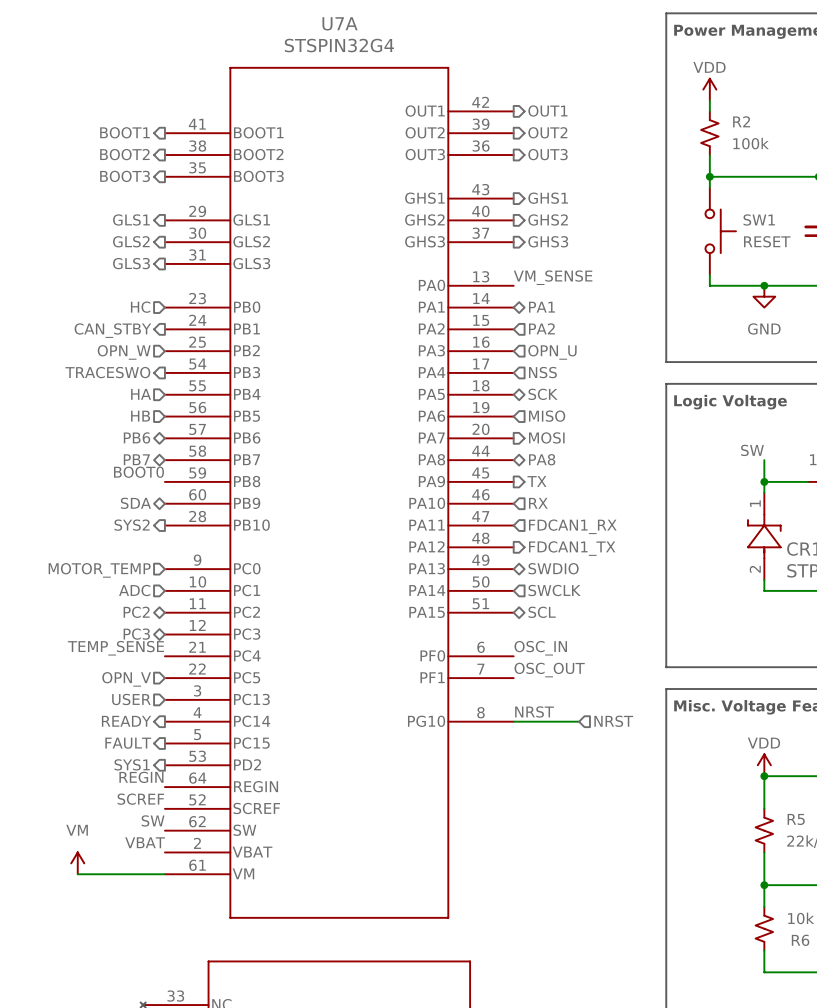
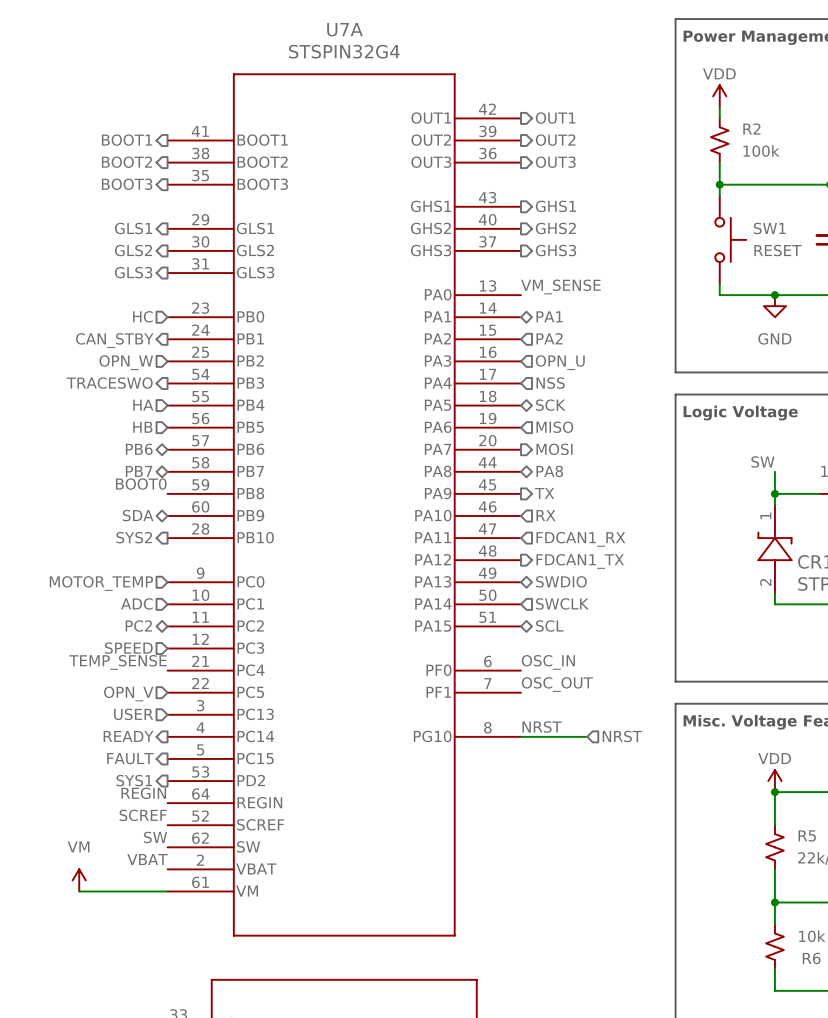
hierarchical label shape: bidirectional (136, 634) -> input (128, 648)
hierarchical label: PC3 (136, 634) -> SPEED (128, 648)

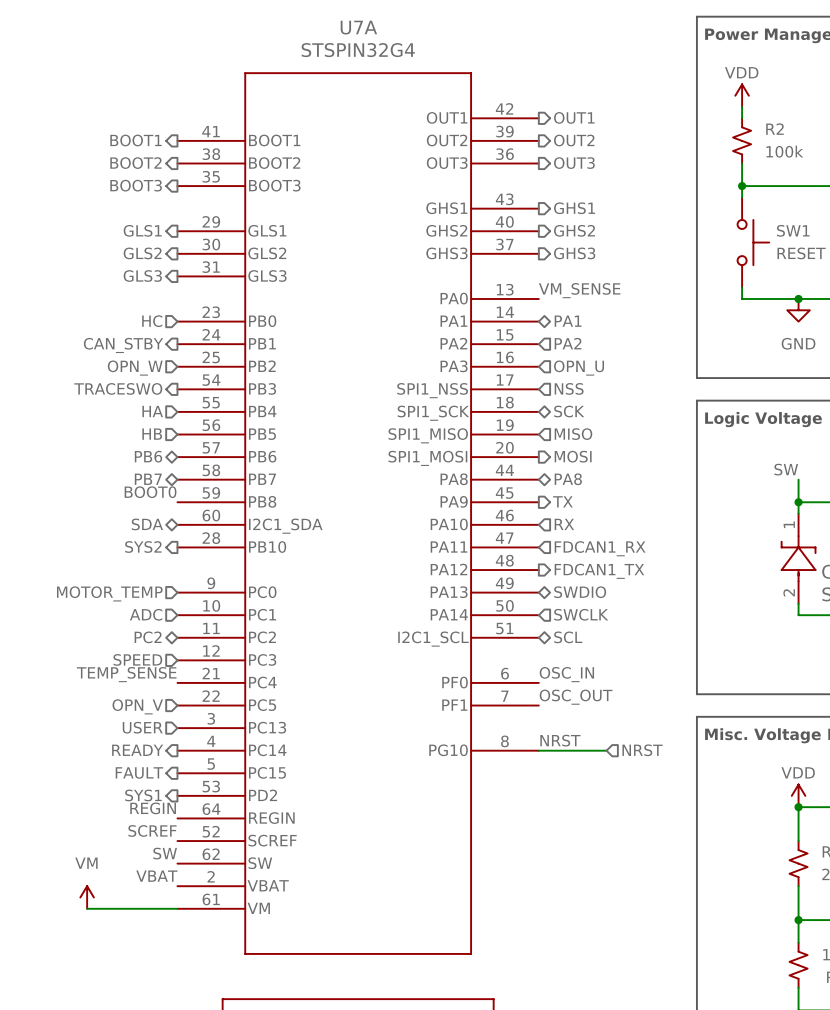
U7A pin name: PA4 (438, 383) -> SPI1_NSS (432, 390)
U7A pin name: PA5 (438, 405) -> SPI1_SCK (433, 413)
U7A pin name: PA6 (438, 427) -> SPI1_MISO (428, 435)
U7A pin name: PA7 (438, 449) -> SPI1_MOSI (427, 458)
U7A pin name: PB9 (250, 515) -> I2C1_SDA (285, 526)
U7A pin name: PA15 (433, 626) -> I2C1_SCL (433, 639)

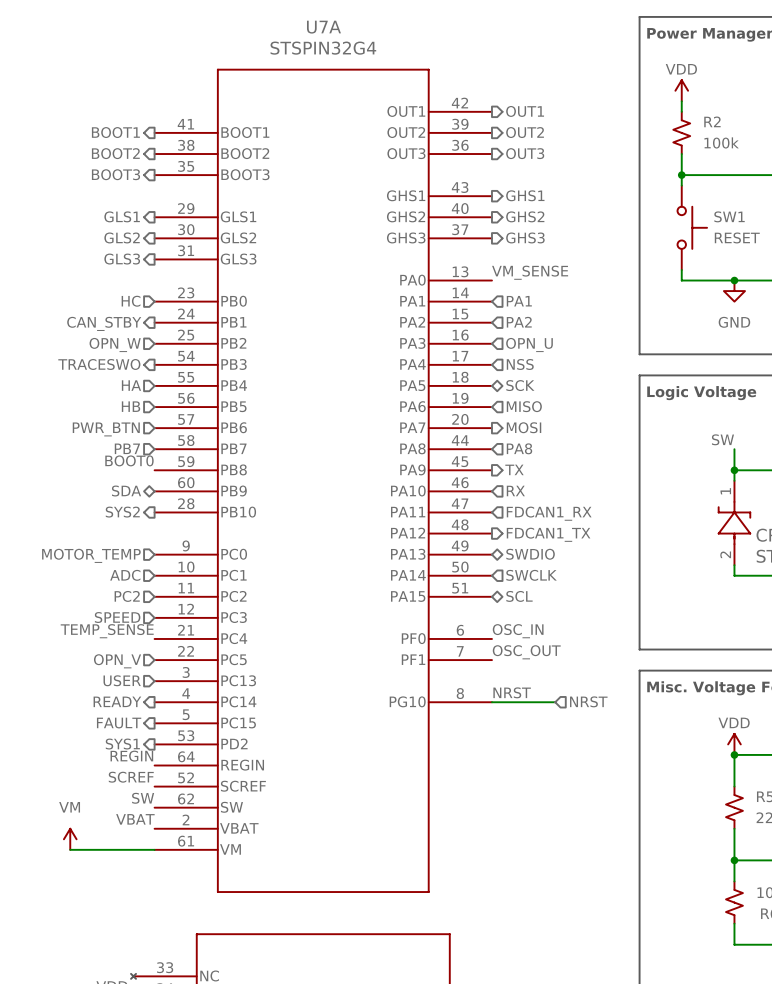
hierarchical label shape: bidirectional (568, 321) -> input (519, 301)
U7A pin name: SPI1_NSS (432, 390) -> PA4 (413, 364)
U7A pin name: SPI1_SCK (433, 413) -> PA5 (412, 385)
U7A pin name: SPI1_MISO (428, 435) -> PA6 (412, 406)
hierarchical label shape: bidirectional (148, 456) -> input (106, 429)
hierarchical label: PB6 (148, 456) -> PWR_BTN (106, 429)
U7A pin name: SPI1_MOSI (427, 458) -> PA7 (412, 427)
hierarchical label shape: bidirectional (148, 479) -> input (127, 448)
hierarchical label shape: bidirectional (568, 479) -> input (519, 448)
U7A pin name: I2C1_SDA (285, 526) -> PB9 (234, 491)
hierarchical label shape: bidirectional (148, 637) -> input (127, 596)
U7A pin name: I2C1_SCL (433, 639) -> PA15 (408, 596)

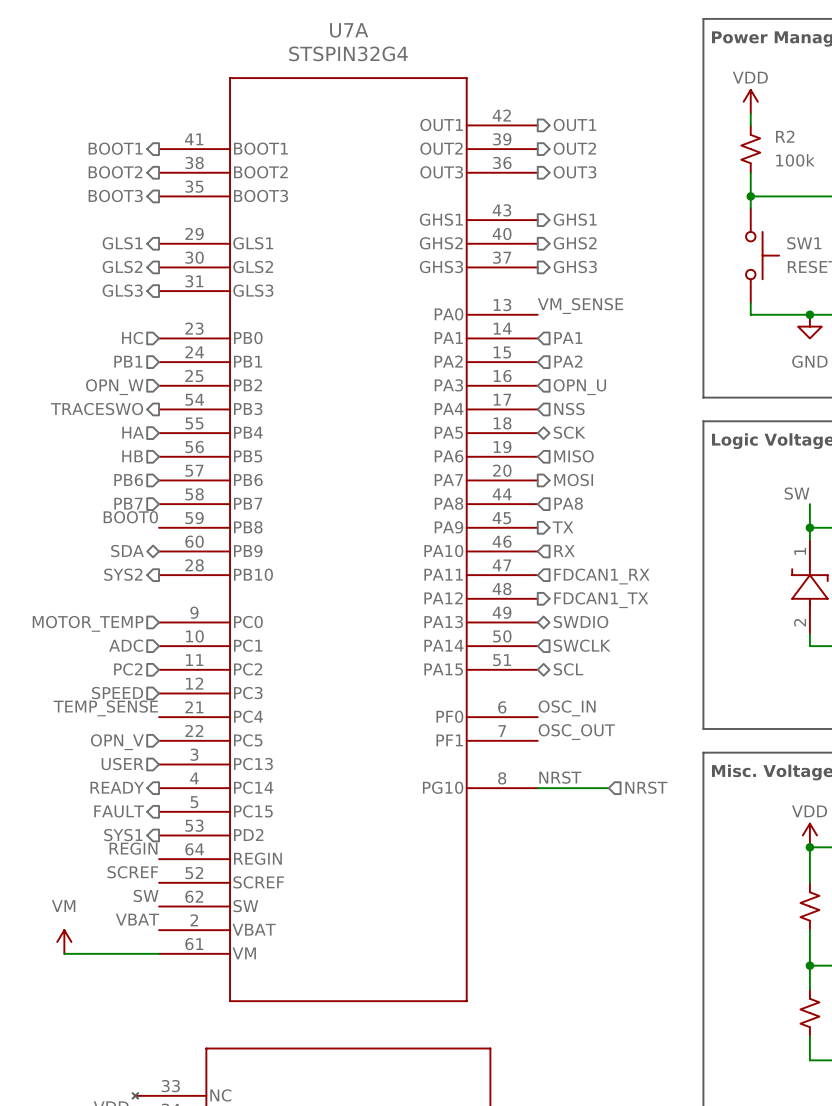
hierarchical label shape: output (104, 323) -> input (128, 361)
hierarchical label: CAN_STBY (104, 323) -> PB1 (128, 361)
hierarchical label: PWR_BTN (106, 429) -> PB6 (128, 480)

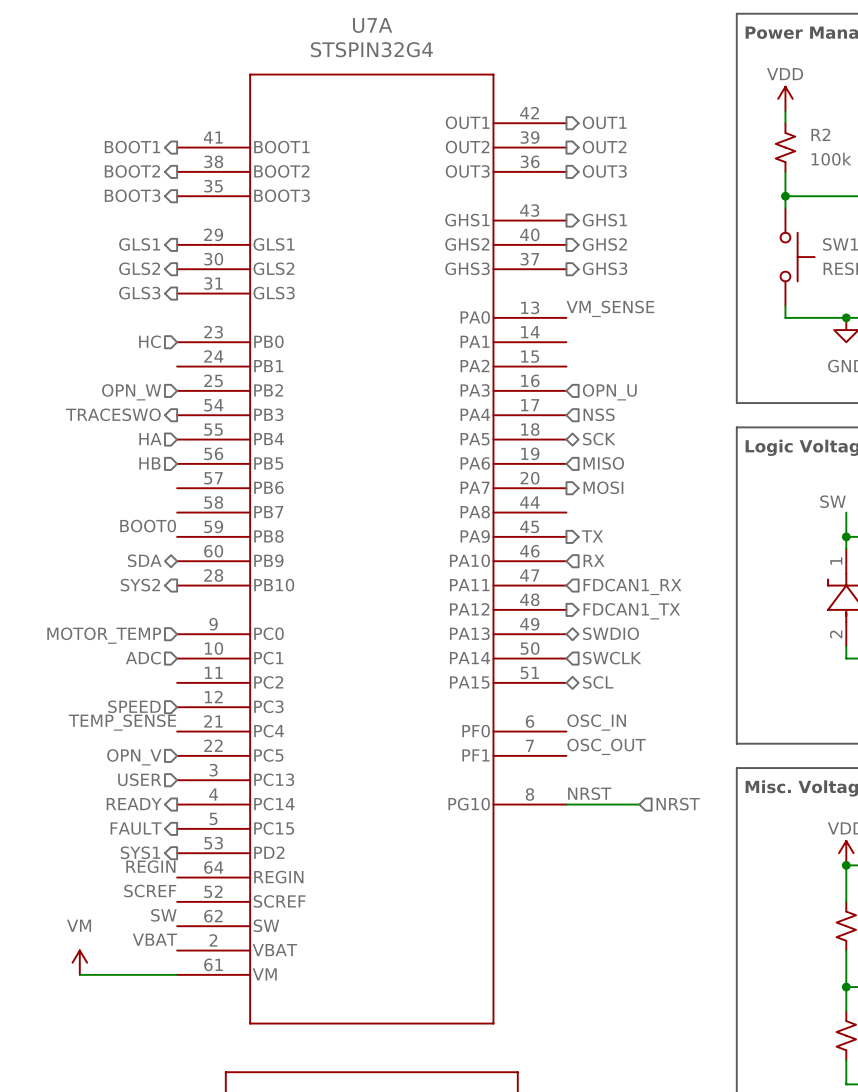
hierarchical label: PA1 (568, 338) -> none
hierarchical label: PB1 (128, 361) -> none
hierarchical label: PA2 (568, 361) -> none
hierarchical label: PB6 (128, 480) -> none
hierarchical label: PB7 (128, 503) -> none
hierarchical label: PA8 (568, 503) -> none
hierarchical label: PC2 (128, 669) -> none

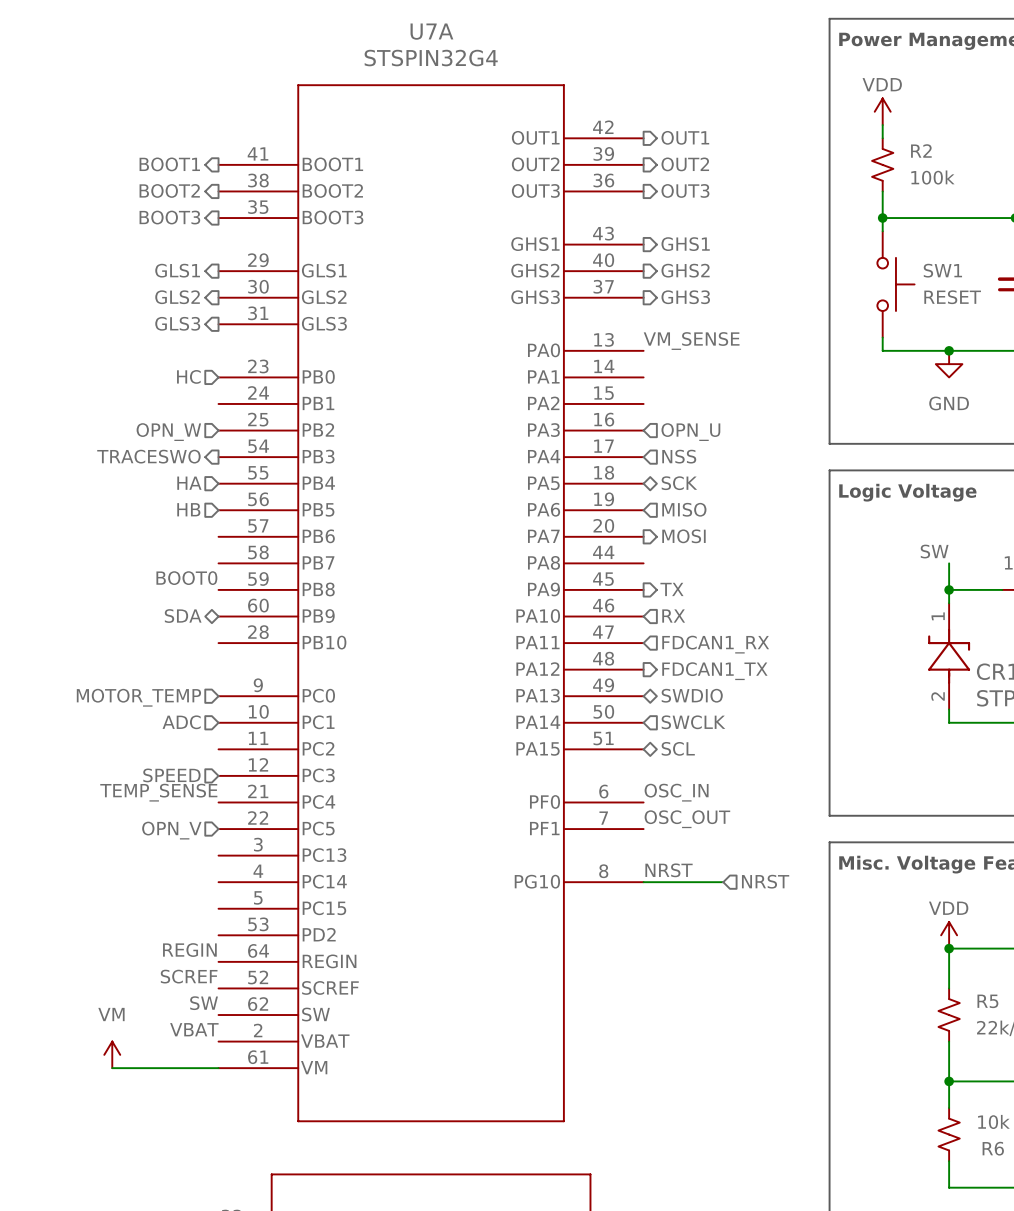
hierarchical label: SYS2 (140, 585) -> none
hierarchical label: USER (139, 779) -> none
hierarchical label: READY (134, 804) -> none
hierarchical label: FAULT (136, 828) -> none
hierarchical label: SYS1 (140, 852) -> none

